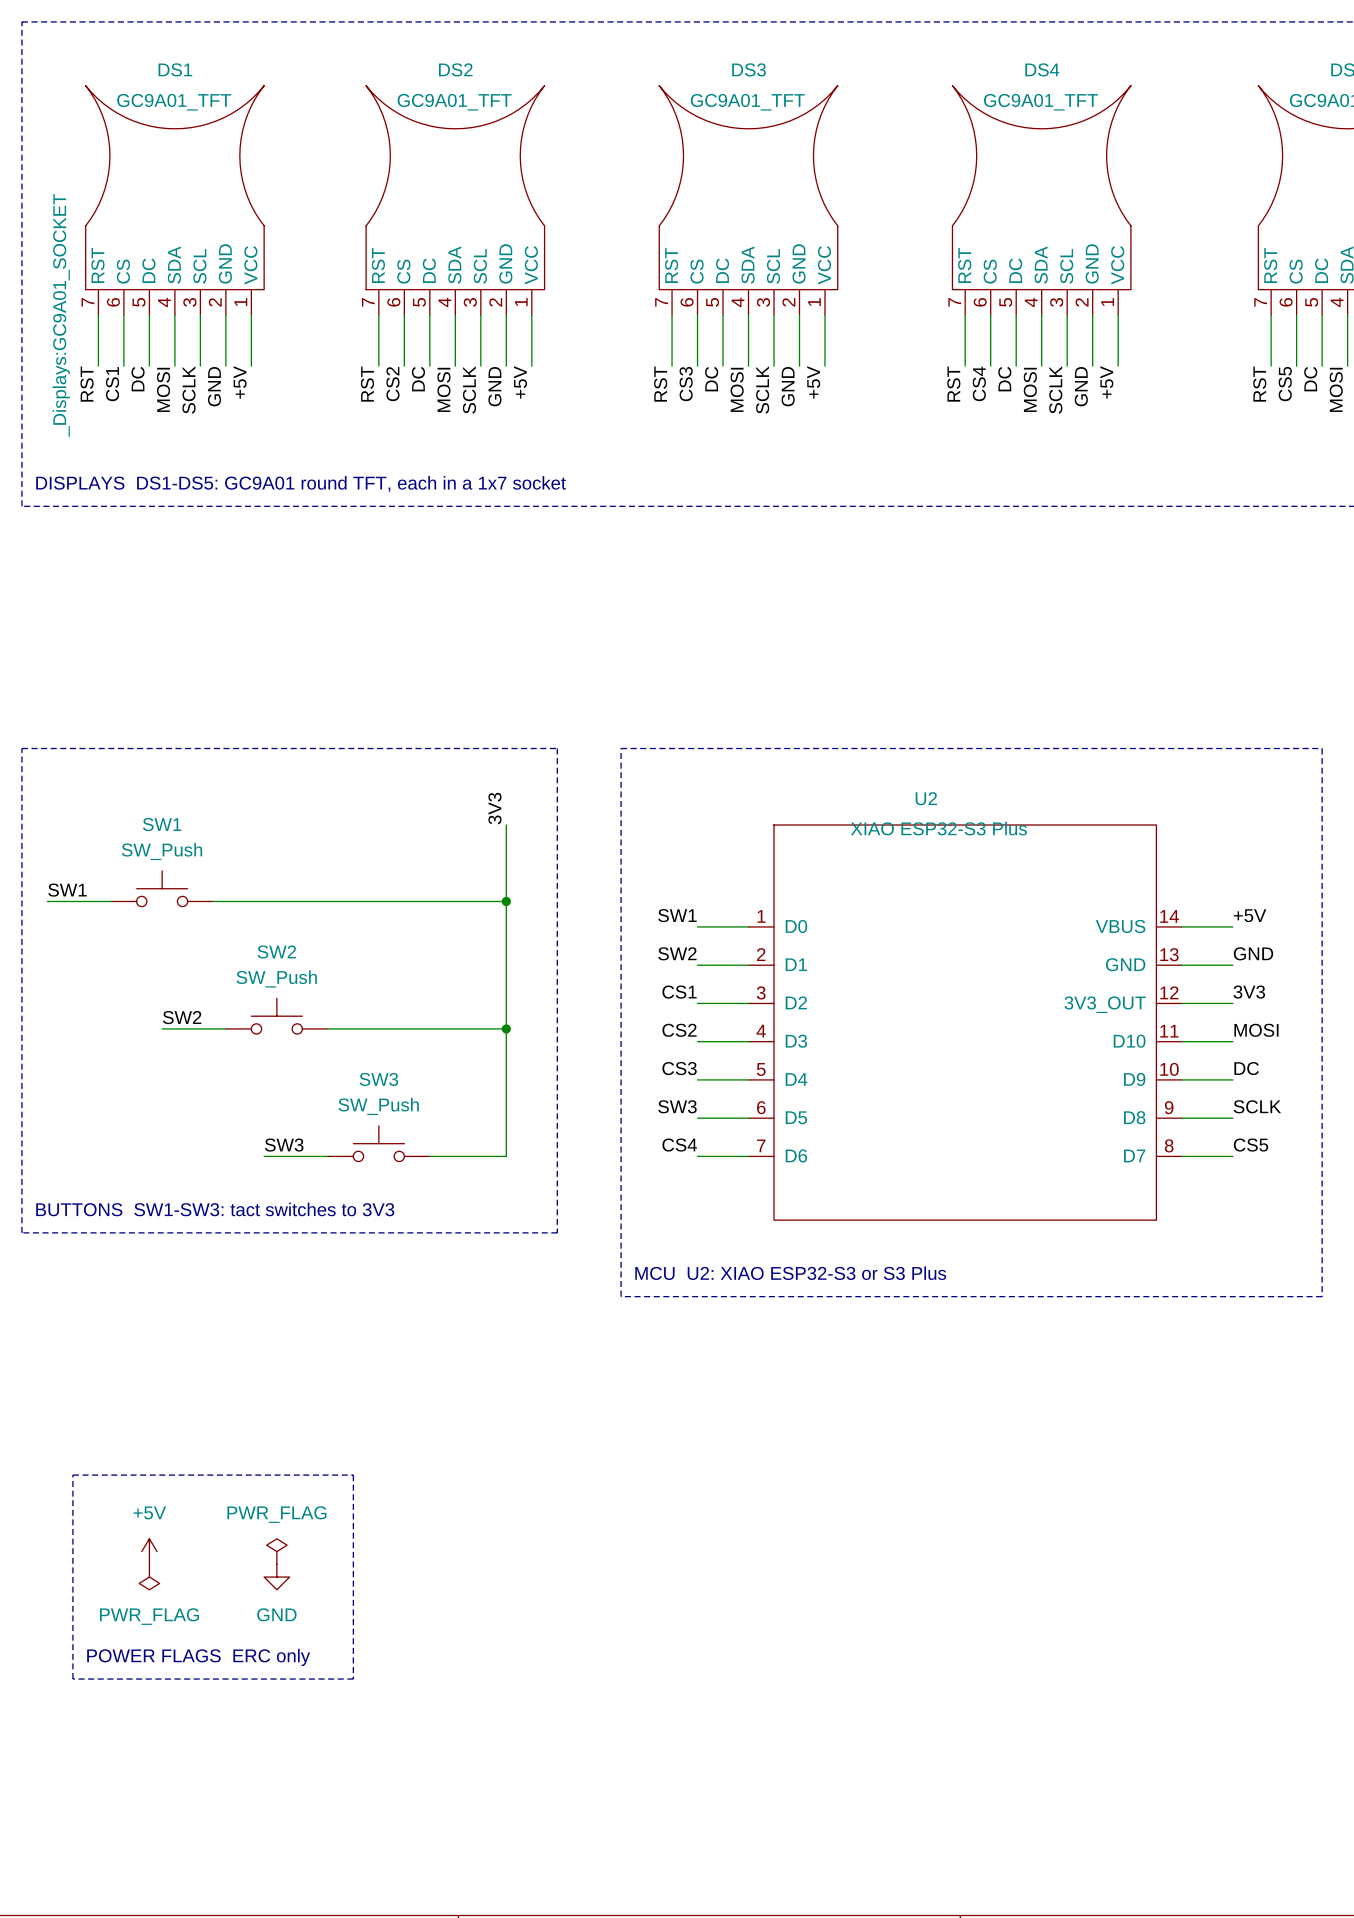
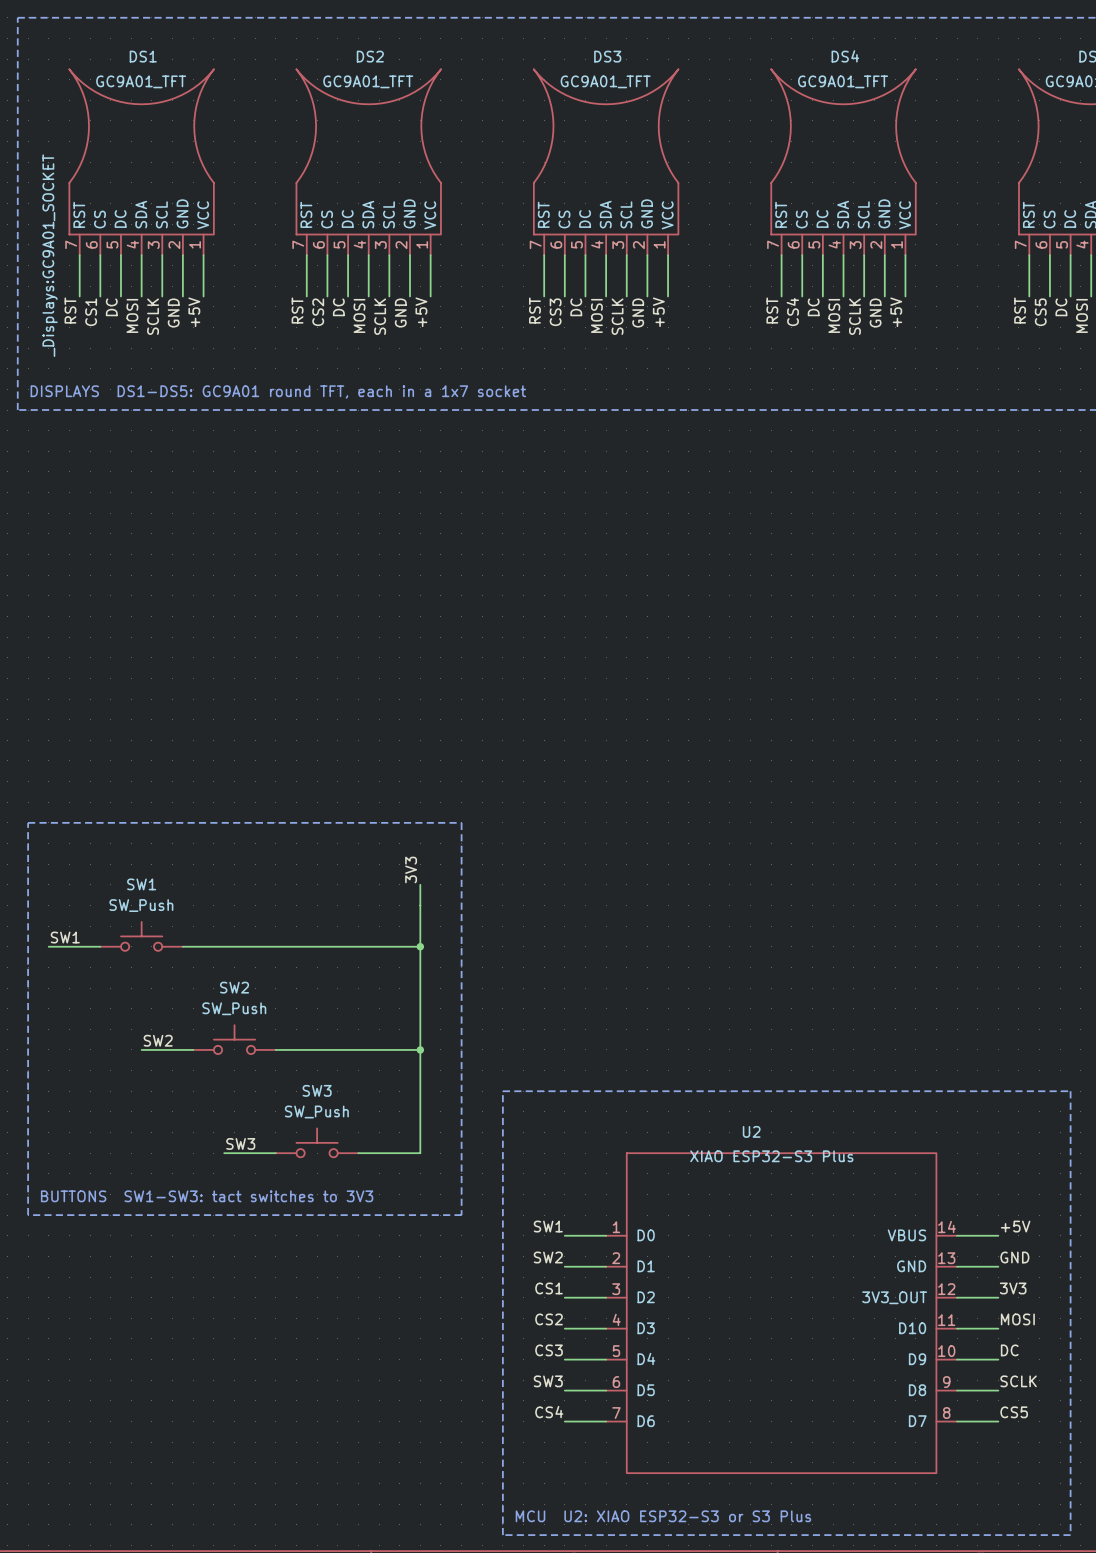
line: (21, 748) (557, 748) (557, 1232) (21, 1232) (21, 748) -> none
line: (621, 748) (1322, 748) (1322, 1296) (621, 1296) (621, 748) -> none
label: 3V3 (494, 808) -> none
wire: (506, 824) (506, 1156) (429, 1156) -> none
SW1 position: (162, 888) -> (141, 936)
label: SW1 (67, 890) -> none
wire: (47, 901) (111, 901) -> none
wire: (213, 901) (506, 901) -> none
junction: (506, 901) -> none
label: SW1 (677, 915) -> none
label: +5V (1250, 915) -> none
wire: (697, 926) (748, 926) -> none
wire: (1181, 926) (1232, 926) -> none
label: SW2 (677, 953) -> none
label: GND (1253, 953) -> none
wire: (697, 965) (748, 965) -> none
wire: (1181, 965) (1232, 965) -> none
label: CS1 (679, 992) -> none
label: 3V3 (1249, 992) -> none
wire: (697, 1003) (748, 1003) -> none
wire: (1181, 1003) (1232, 1003) -> none
line: none -> (28, 822) (461, 822) (461, 1215) (28, 1215) (28, 822)
SW2 position: (276, 1016) -> (234, 1039)
label: SW2 (182, 1017) -> none
U2 position: (965, 1022) -> (781, 1313)
wire: (162, 1028) (225, 1028) -> (48, 946) (100, 946)
wire: (327, 1028) (506, 1028) -> none
junction: (506, 1028) -> none
label: CS2 (679, 1030) -> none
label: MOSI (1256, 1030) -> none
wire: (697, 1041) (748, 1041) -> none
wire: (1181, 1041) (1232, 1041) -> none
label: CS3 (679, 1068) -> none
label: DC (1246, 1068) -> none
label: none -> 3V3 (411, 869)
wire: (697, 1079) (748, 1079) -> none
wire: (1181, 1079) (1232, 1079) -> none
wire: none -> (420, 884) (420, 1153) (358, 1153)
label: SW3 (677, 1106) -> none
label: SCLK (1257, 1106) -> none
wire: (697, 1118) (748, 1118) -> none
wire: (1181, 1118) (1232, 1118) -> none
SW3 position: (378, 1143) -> (317, 1142)
label: SW3 (284, 1145) -> none
label: CS4 (679, 1145) -> none
label: CS5 (1251, 1145) -> none
wire: (264, 1156) (327, 1156) -> (141, 1049) (193, 1049)
wire: (697, 1156) (748, 1156) -> none
wire: (1181, 1156) (1232, 1156) -> none
label: none -> SW1 (65, 937)
wire: none -> (182, 946) (420, 946)
junction: none -> (420, 946)
text: BUTTONS SW1-SW3: tact switches to 3V3 (215, 1209) -> none
text: MCU U2: XIAO ESP32-S3 or S3 Plus (790, 1273) -> none
label: none -> SW2 (158, 1040)
wire: none -> (275, 1049) (420, 1049)
junction: none -> (420, 1049)
line: none -> (502, 1091) (1070, 1091) (1070, 1535) (502, 1535) (502, 1091)
label: none -> SW3 (240, 1143)
wire: none -> (224, 1153) (275, 1153)
line: (72, 1475) (353, 1475) (353, 1679) (72, 1679) (72, 1475) -> none
text: none -> BUTTONS SW1-SW3: tact switches to 3V3 (207, 1196)
label: none -> SW1 (548, 1226)
label: none -> +5V (1015, 1226)
wire: none -> (564, 1235) (606, 1235)
wire: none -> (957, 1235) (998, 1235)
power symbol: +5V (149, 1551) -> none
power symbol: PWR_FLAG (276, 1551) -> none
label: none -> SW2 (548, 1257)
label: none -> GND (1014, 1257)
wire: none -> (564, 1266) (606, 1266)
wire: none -> (957, 1266) (998, 1266)
power symbol: PWR_FLAG (149, 1577) -> none
power symbol: GND (276, 1577) -> none
label: none -> CS1 (549, 1288)
label: none -> 3V3 (1013, 1288)
wire: none -> (564, 1297) (606, 1297)
wire: none -> (957, 1297) (998, 1297)
label: none -> CS2 (549, 1319)
label: none -> MOSI (1017, 1319)
wire: none -> (564, 1328) (606, 1328)
wire: none -> (957, 1328) (998, 1328)
text: POWER FLAGS ERC only (198, 1657) -> none
label: none -> CS3 (549, 1350)
label: none -> DC (1009, 1350)
wire: none -> (564, 1359) (606, 1359)
wire: none -> (957, 1359) (998, 1359)
label: none -> SW3 (548, 1381)
label: none -> SCLK (1018, 1381)
wire: none -> (564, 1390) (606, 1390)
wire: none -> (957, 1390) (998, 1390)
label: none -> CS4 (549, 1412)
label: none -> CS5 (1014, 1412)
wire: none -> (564, 1421) (606, 1421)
wire: none -> (957, 1421) (998, 1421)
text: none -> MCU U2: XIAO ESP32-S3 or S3 Plus (663, 1516)

